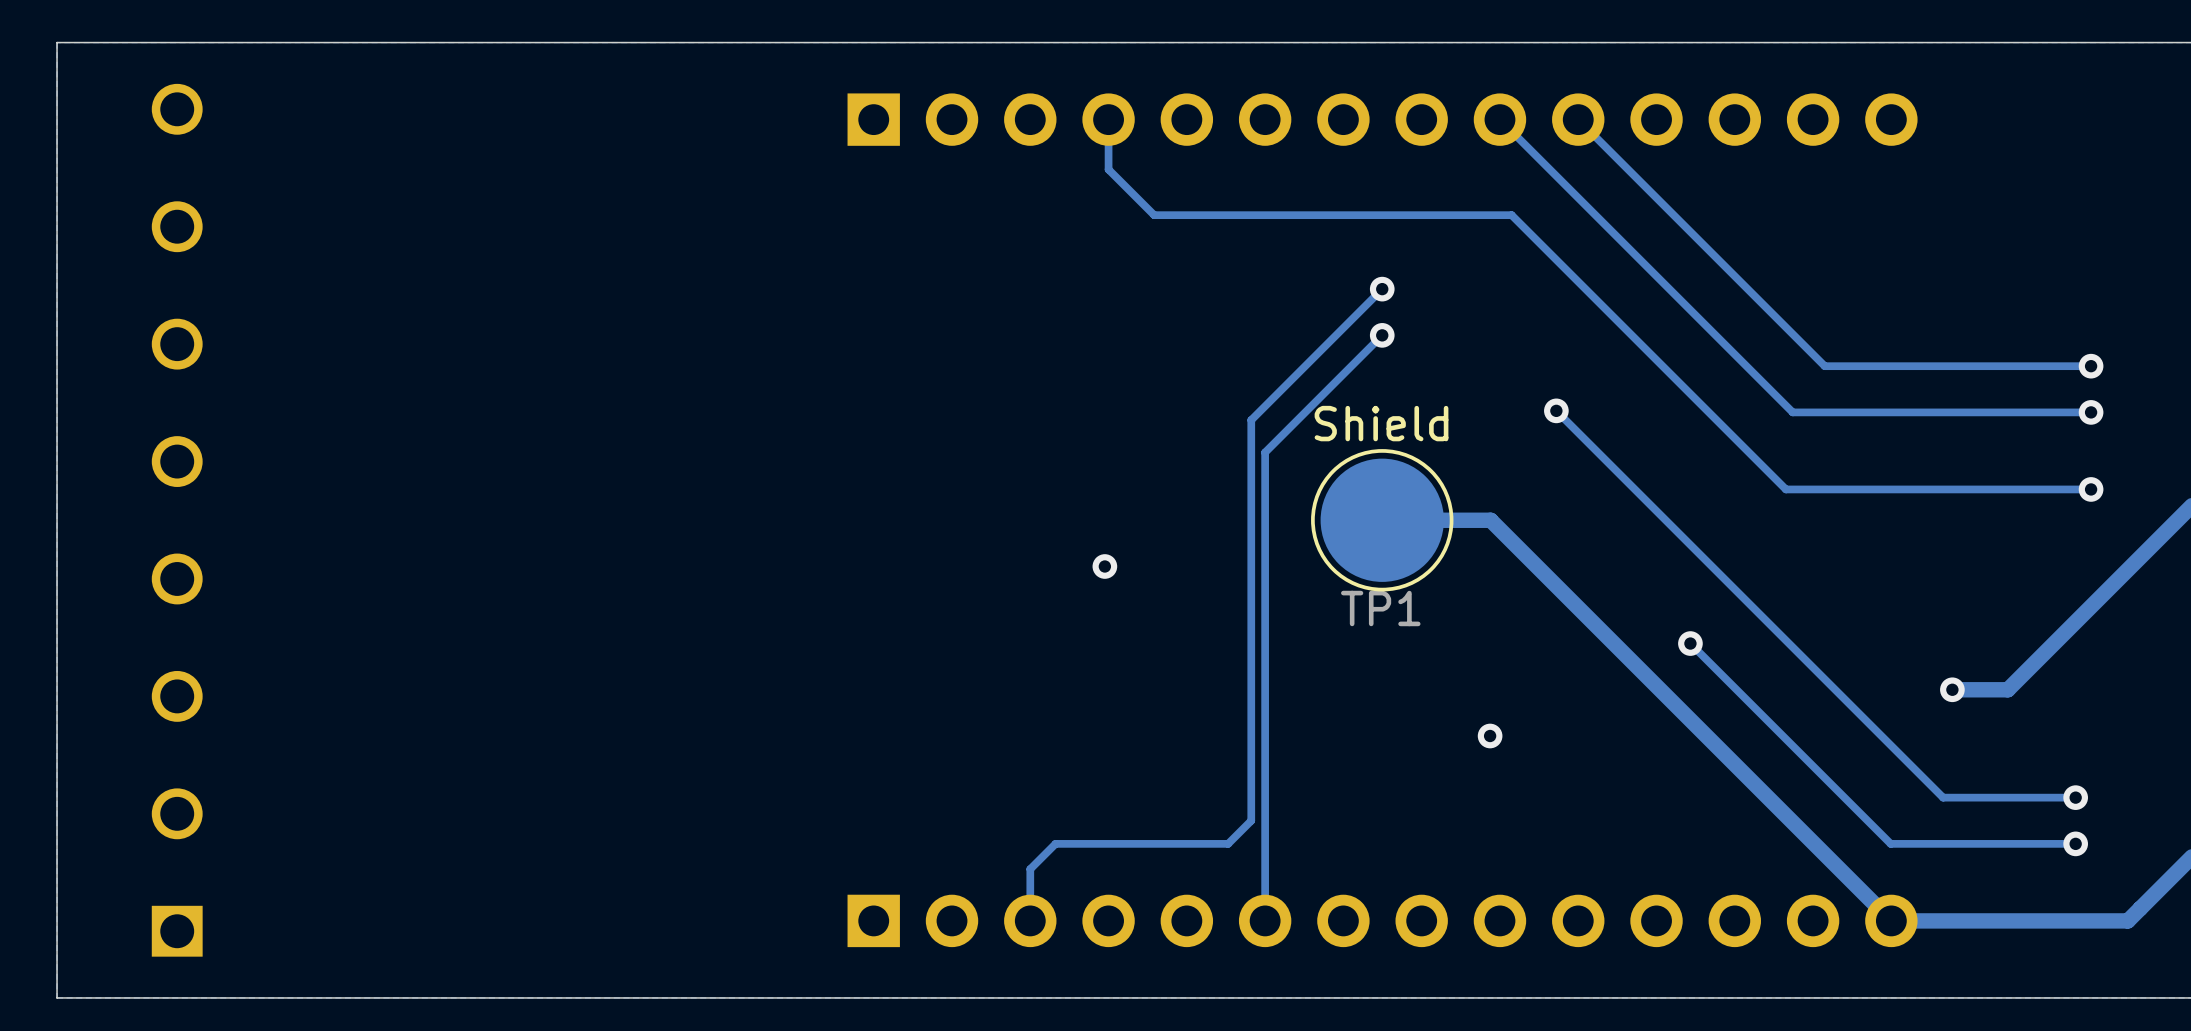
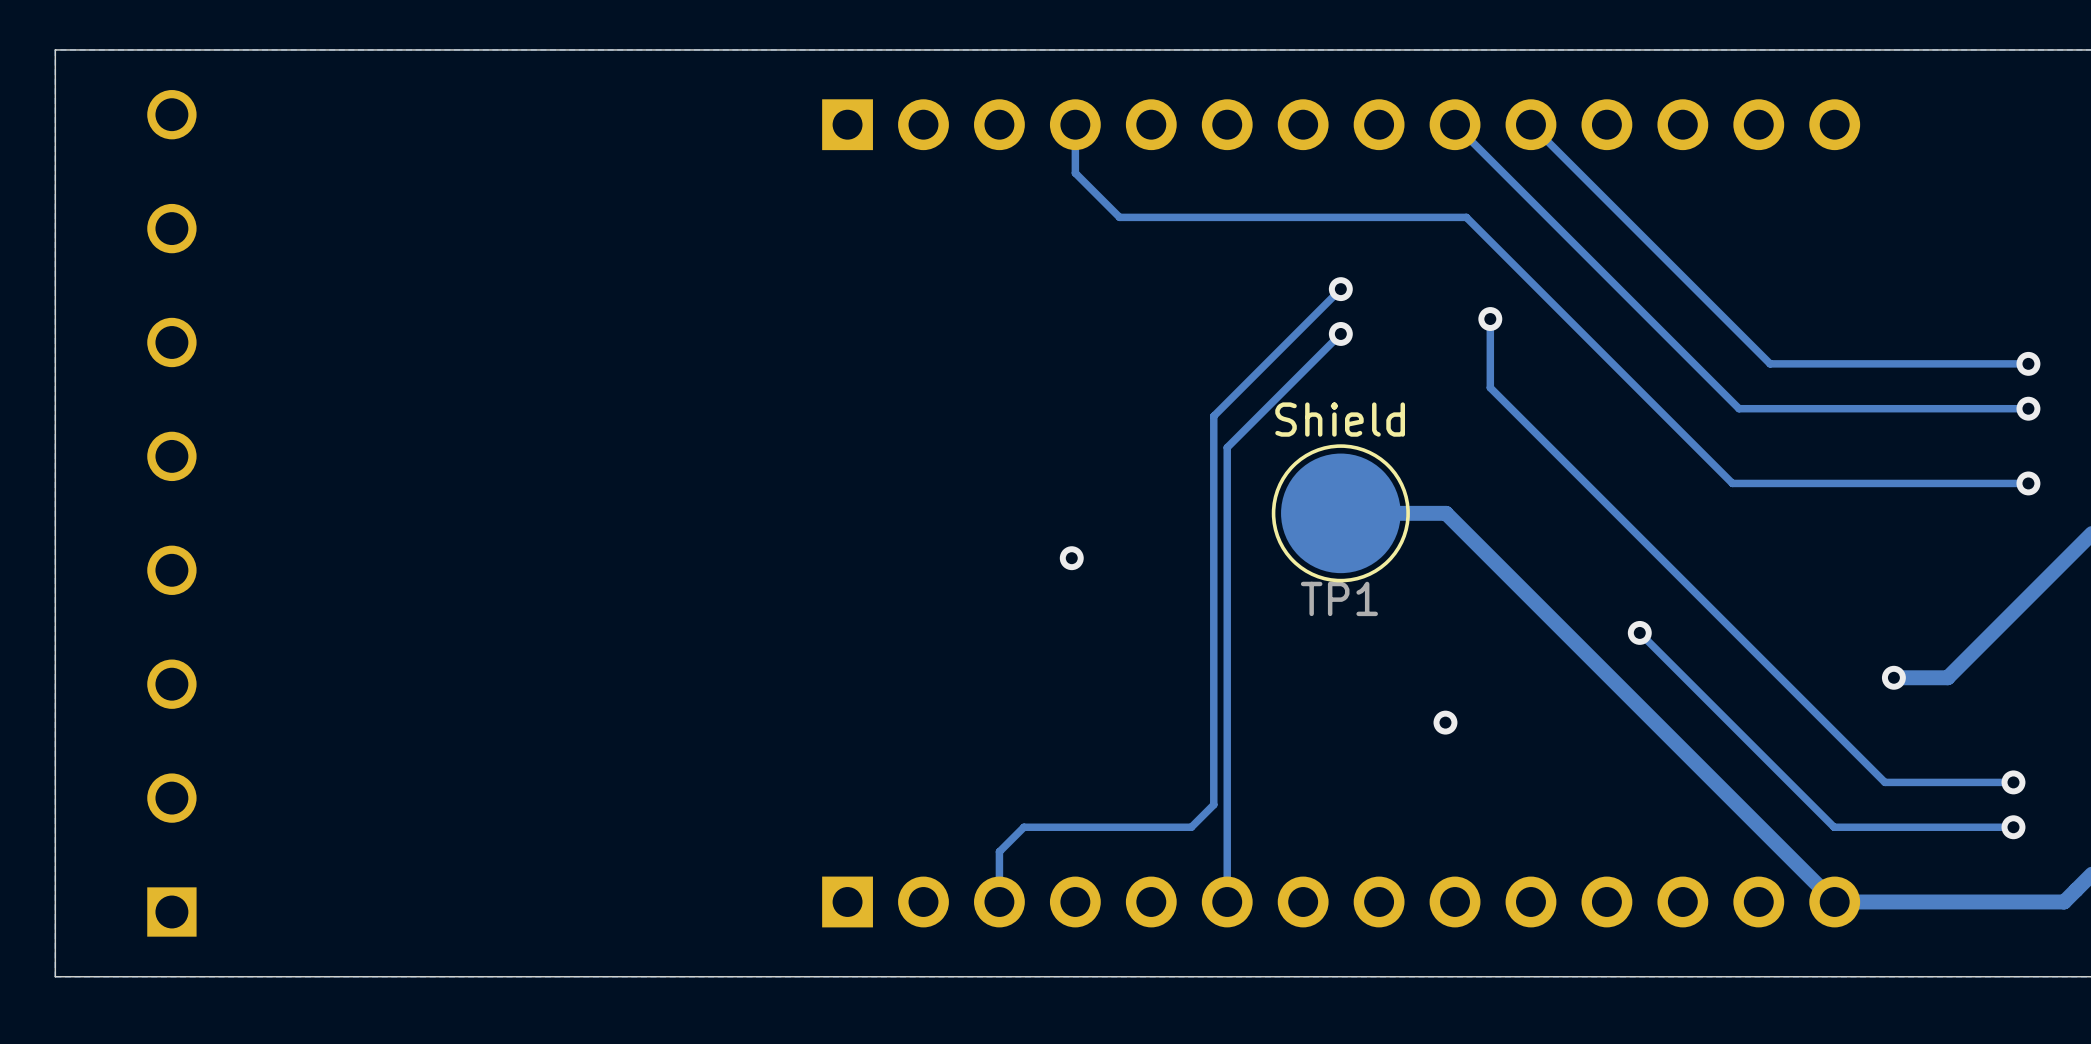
track: none -> (1490, 319) (1490, 387) (1509, 407)
via position: (1556, 410) -> (1490, 319)

